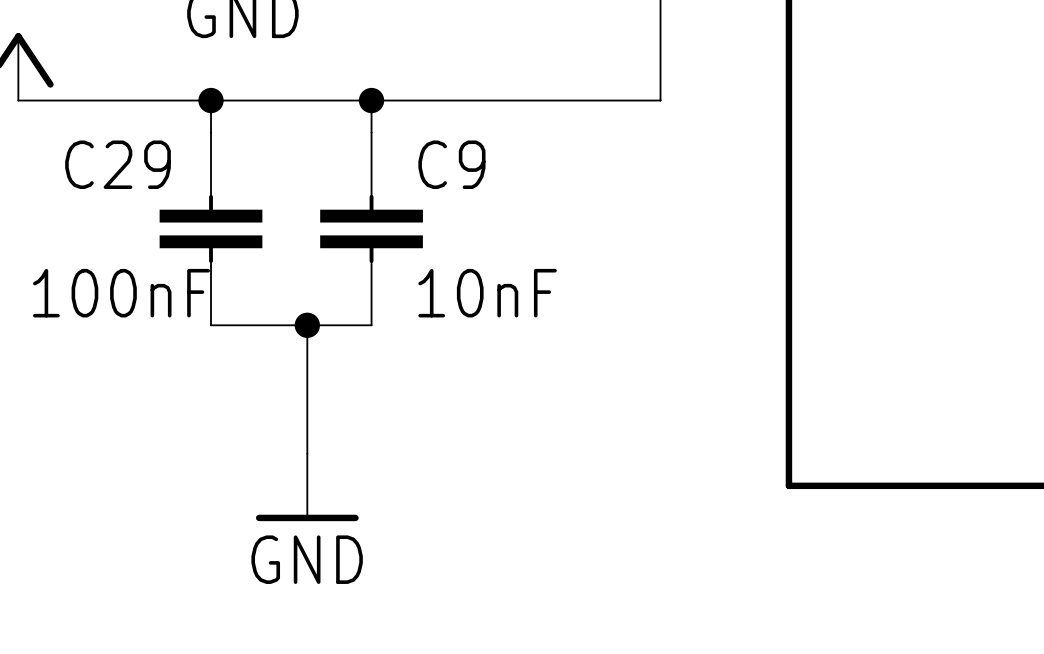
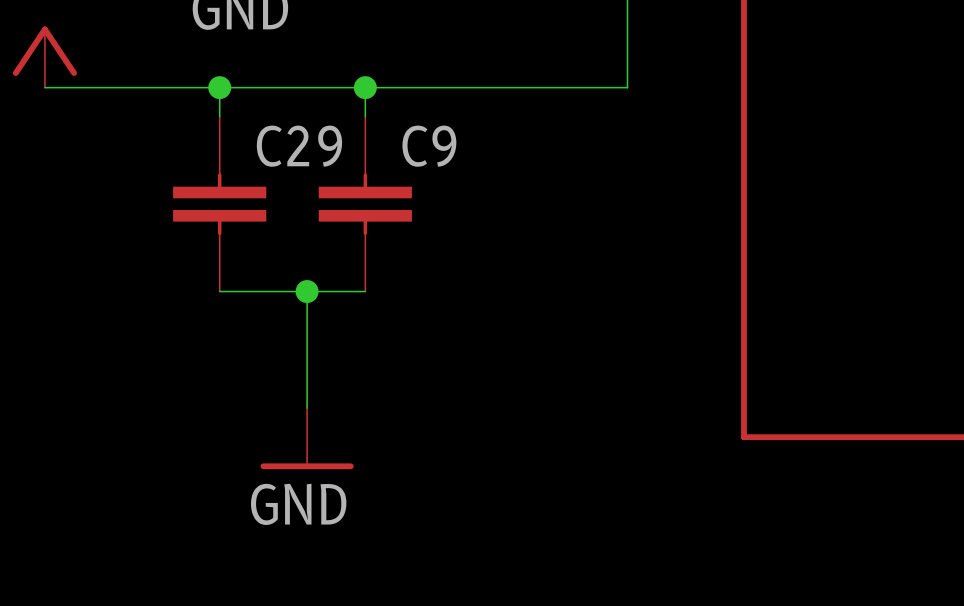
C29 name position: C29 (118, 164) -> C29 (299, 146)
C29 value: 100nF (121, 293) -> none
C9 value: 10nF (487, 293) -> none

